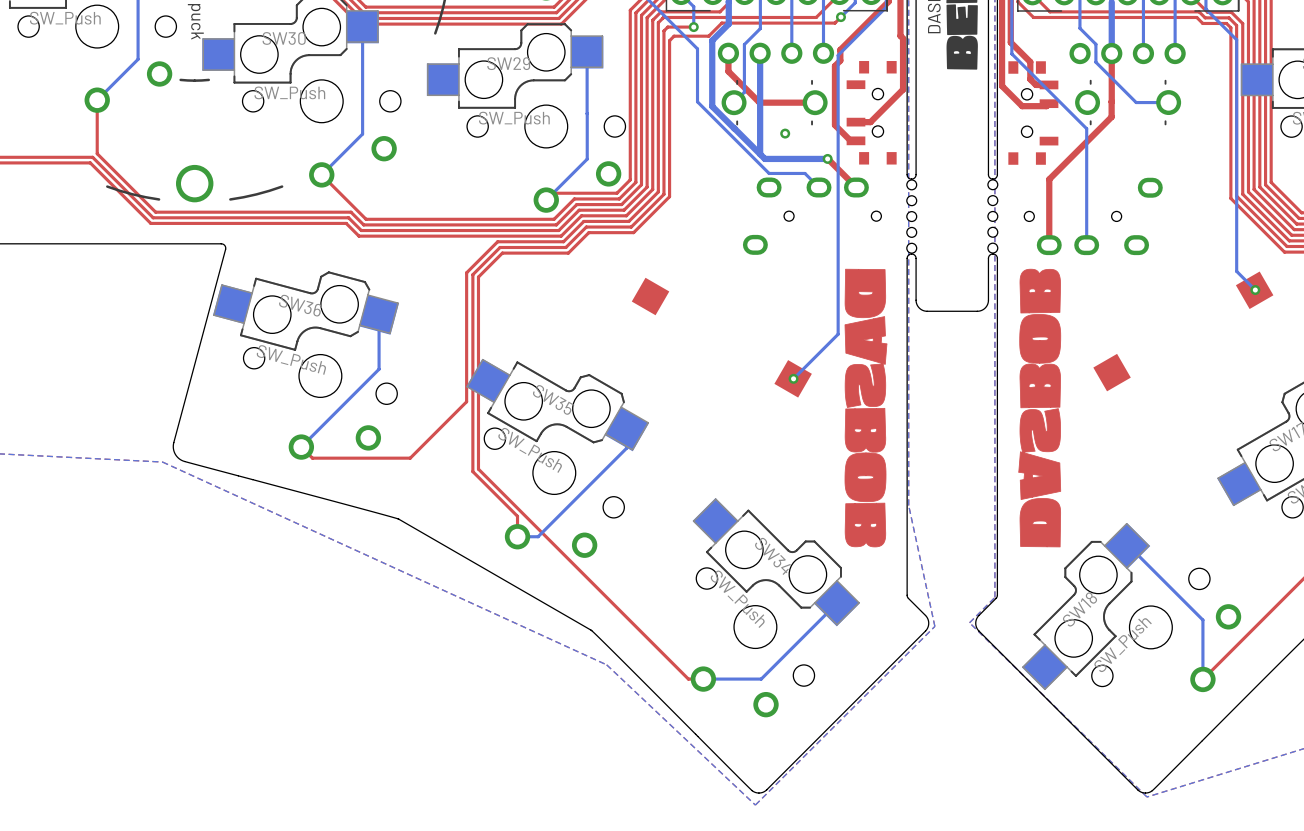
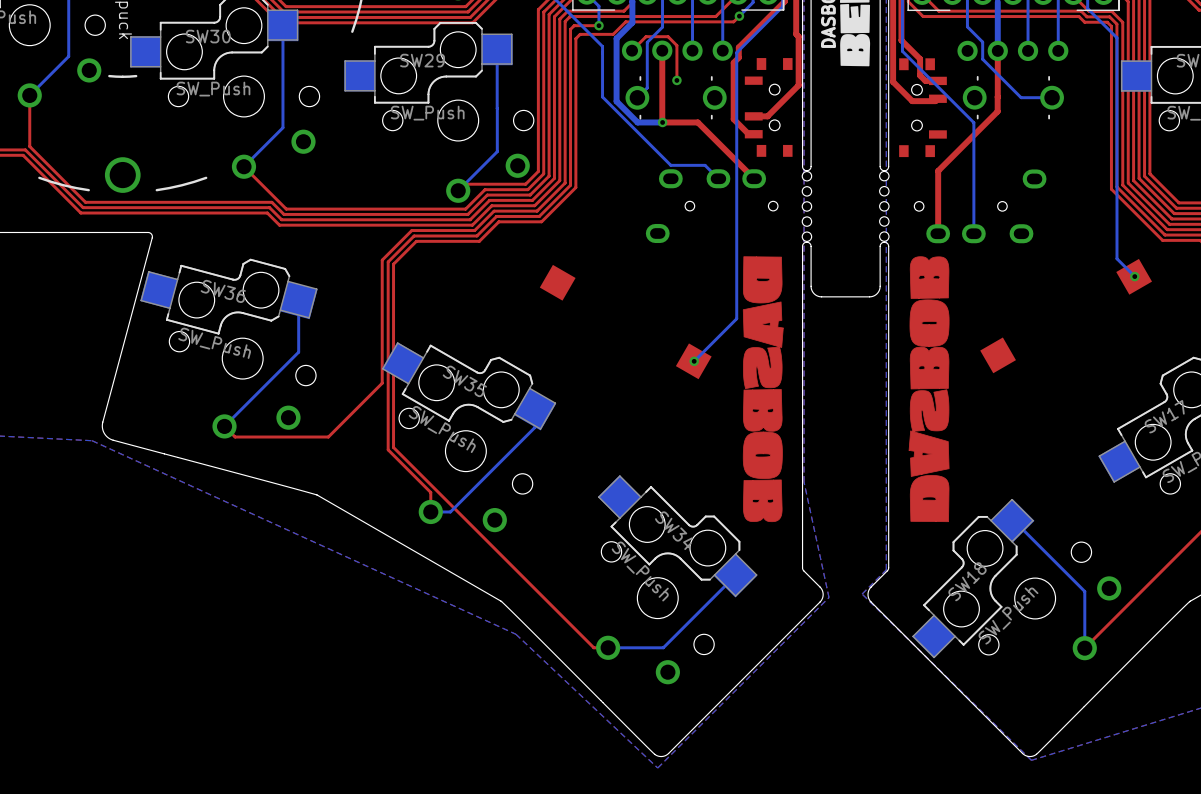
top track: (728, 53) (728, 71) (759, 102) (815, 102) -> (632, 50) (646, 36) (668, 36) (676, 45) (676, 80)
top track: none -> (662, 50) (662, 122) (697, 122) (726, 151)
bottom track: (760, 53) (760, 154) -> none
via: none -> (676, 80)
bottom track: (734, 128) (764, 158) (827, 158) -> (637, 122) (662, 122)
via: none -> (662, 122)
via: (785, 133) -> none
via: (827, 158) -> none

